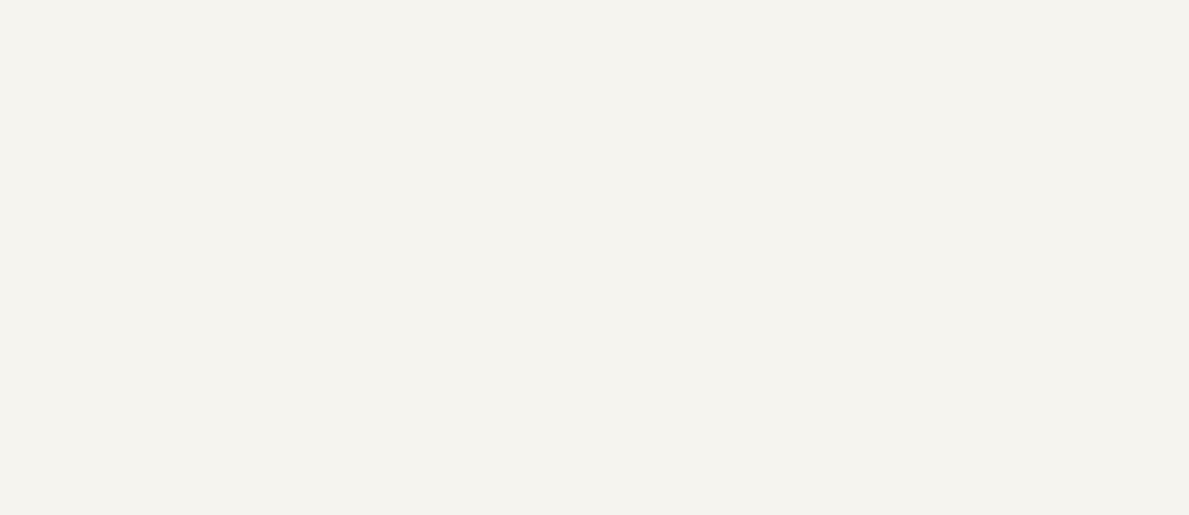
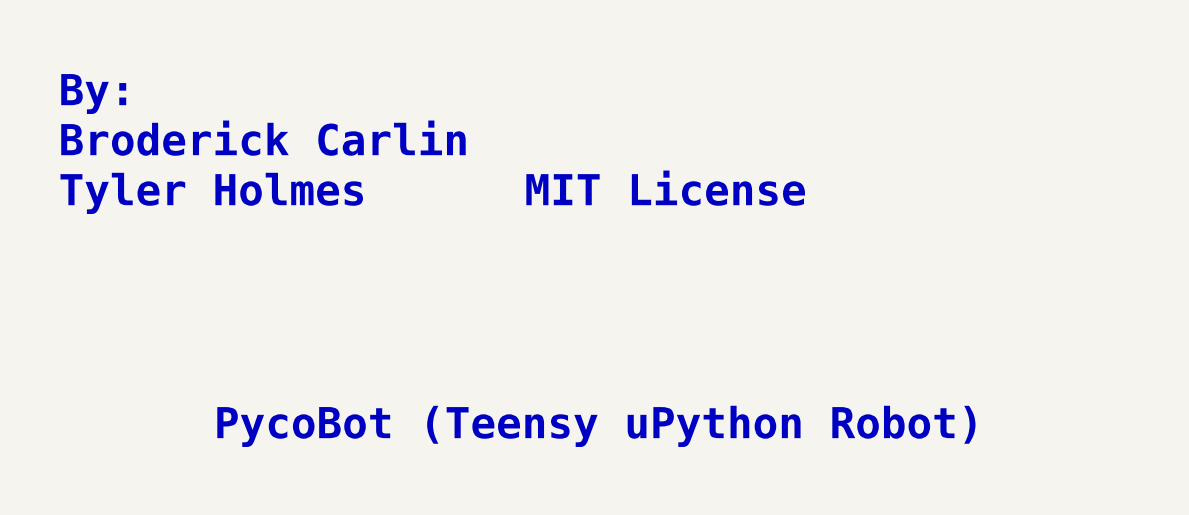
text: none -> By: (93, 94)
text: none -> Broderick Carlin (263, 138)
text: none -> MIT License (665, 188)
text: none -> Tyler Holmes (211, 193)
text: none -> PycoBot (Teensy uPython Robot) (596, 426)

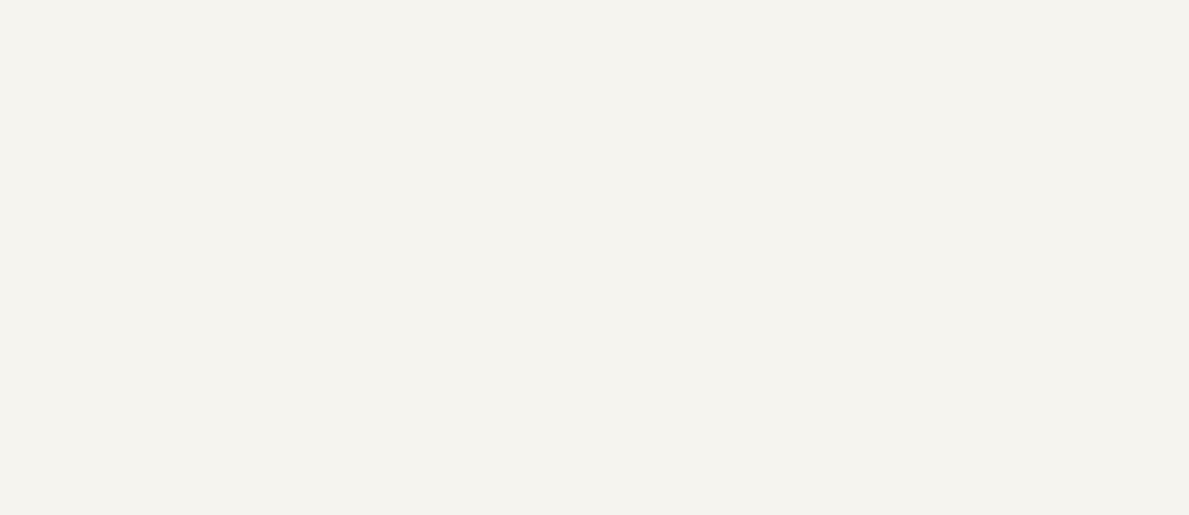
text: By: (93, 94) -> none
text: Broderick Carlin (263, 138) -> none
text: MIT License (665, 188) -> none
text: Tyler Holmes (211, 193) -> none
text: PycoBot (Teensy uPython Robot) (596, 426) -> none

